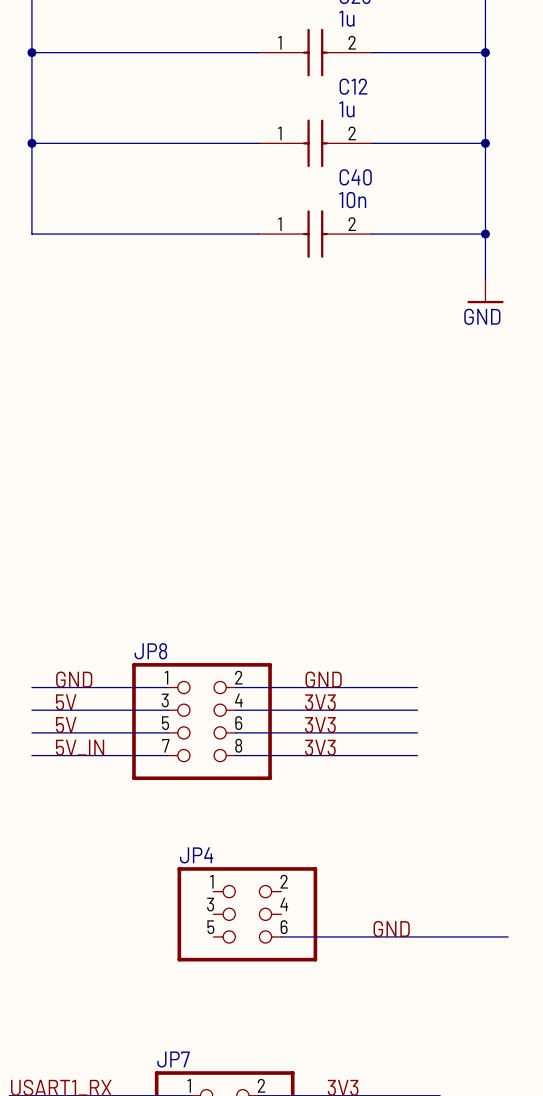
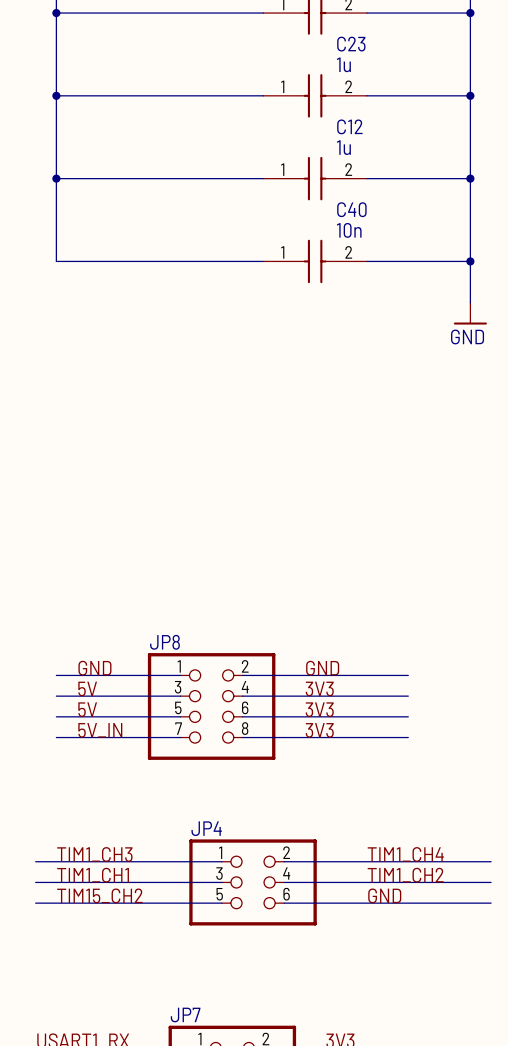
label: none -> TIM1_CH3 (94, 854)
label: none -> TIM1_CH4 (405, 854)
wire: none -> (35, 861) (221, 861)
wire: none -> (284, 861) (491, 861)
label: none -> TIM1_CH1 (93, 875)
label: none -> TIM1_CH2 (405, 875)
wire: none -> (35, 882) (221, 882)
wire: none -> (284, 882) (491, 882)
label: none -> TIM15_CH2 (99, 895)
wire: none -> (35, 903) (221, 903)

